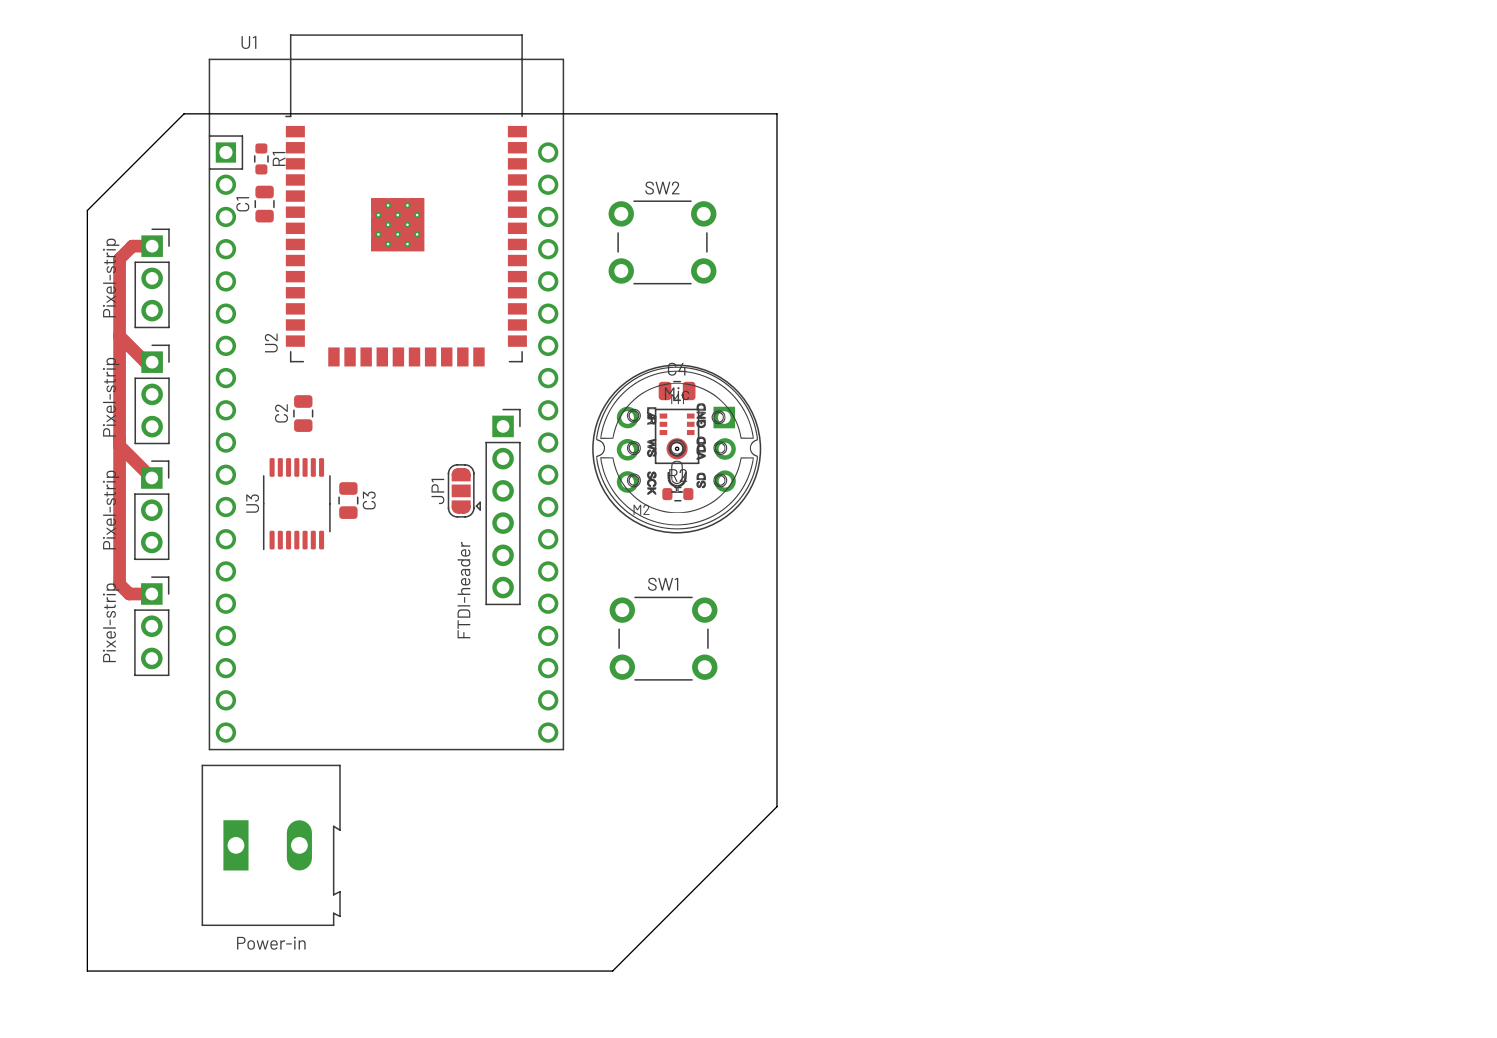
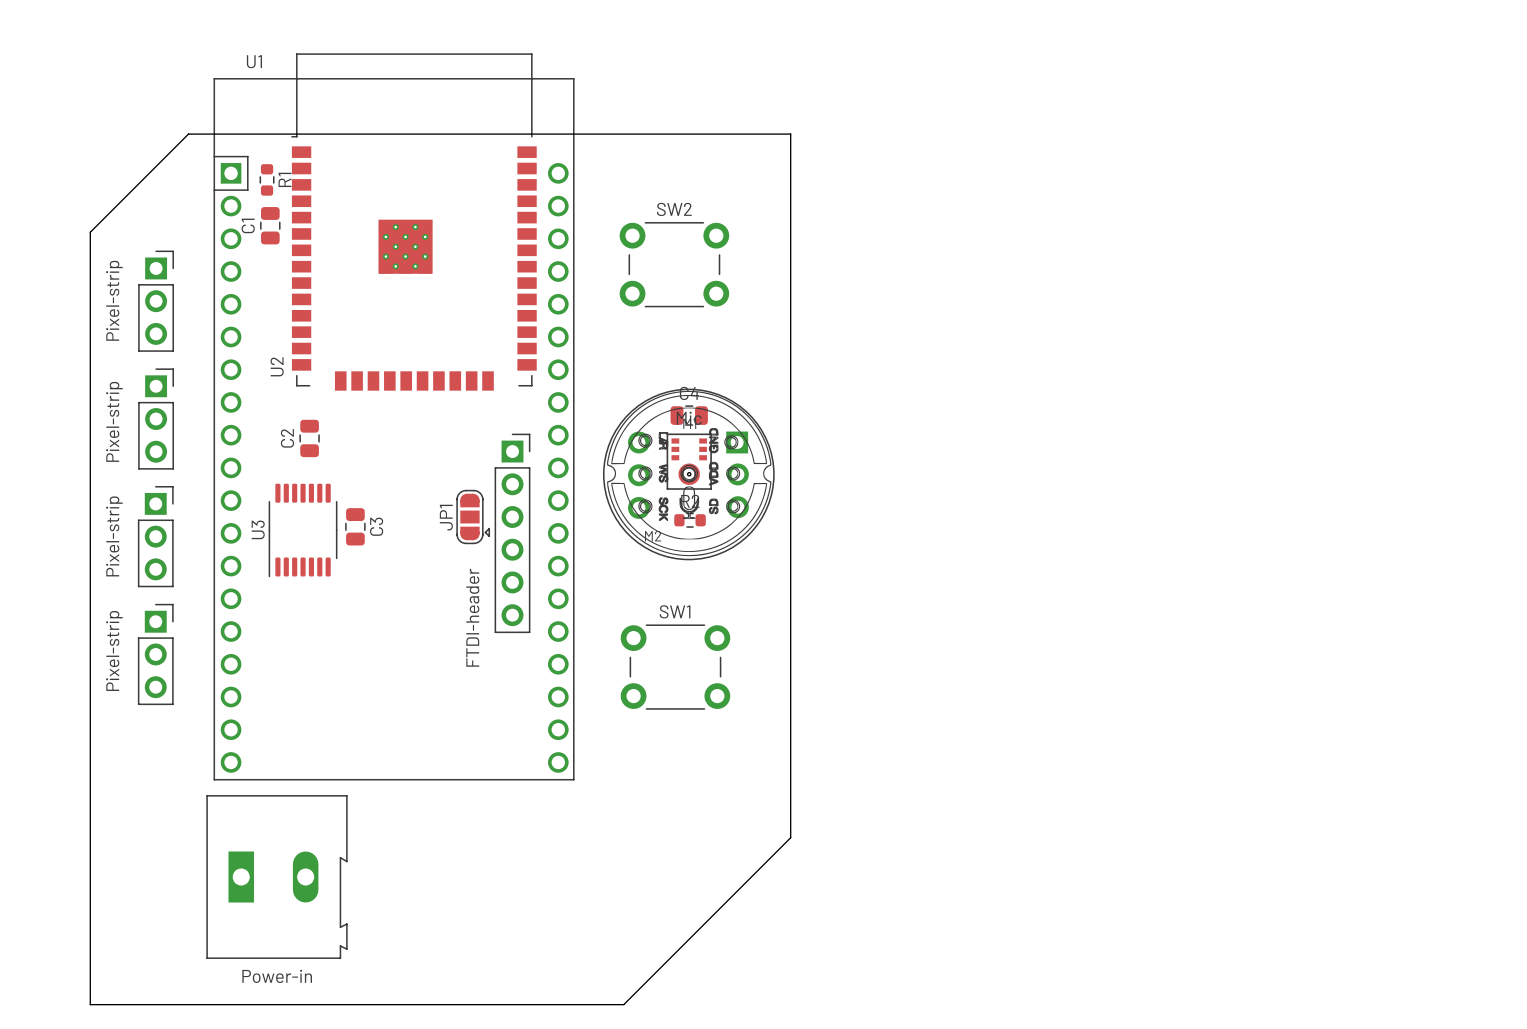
track: (152, 246) (132, 246) (119, 258) (119, 584) (129, 594) (151, 594) -> none
track: (119, 336) (145, 362) (152, 362) -> none
track: (119, 445) (151, 477) -> none

